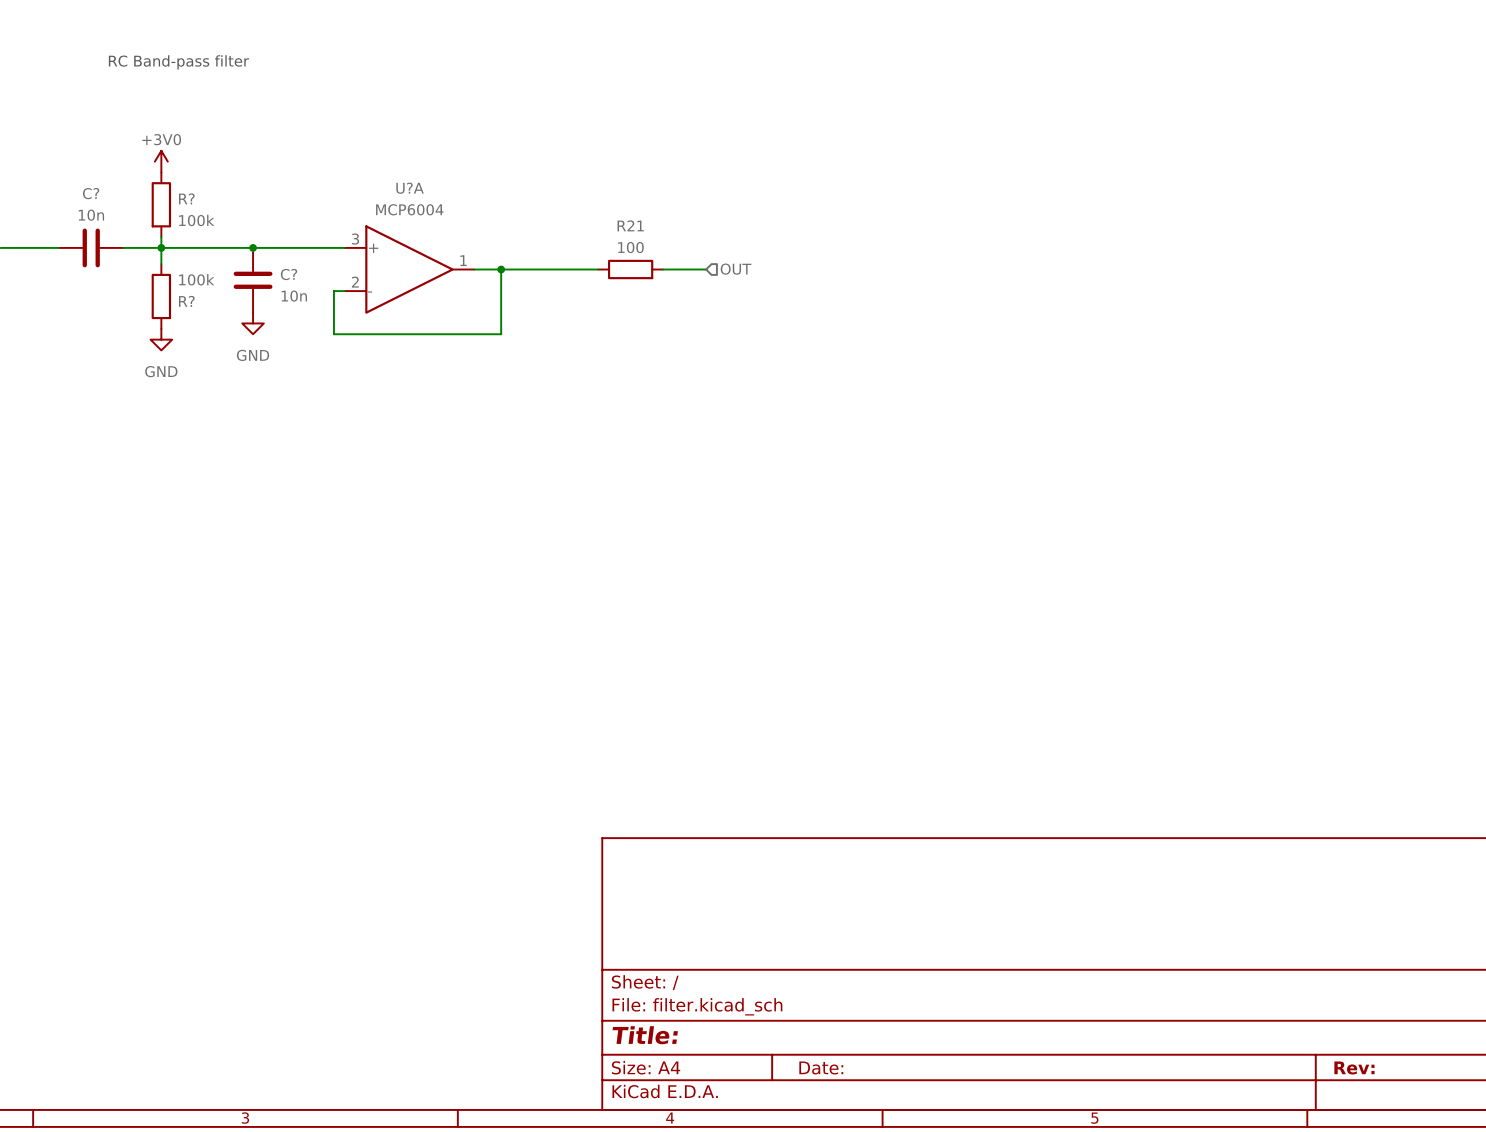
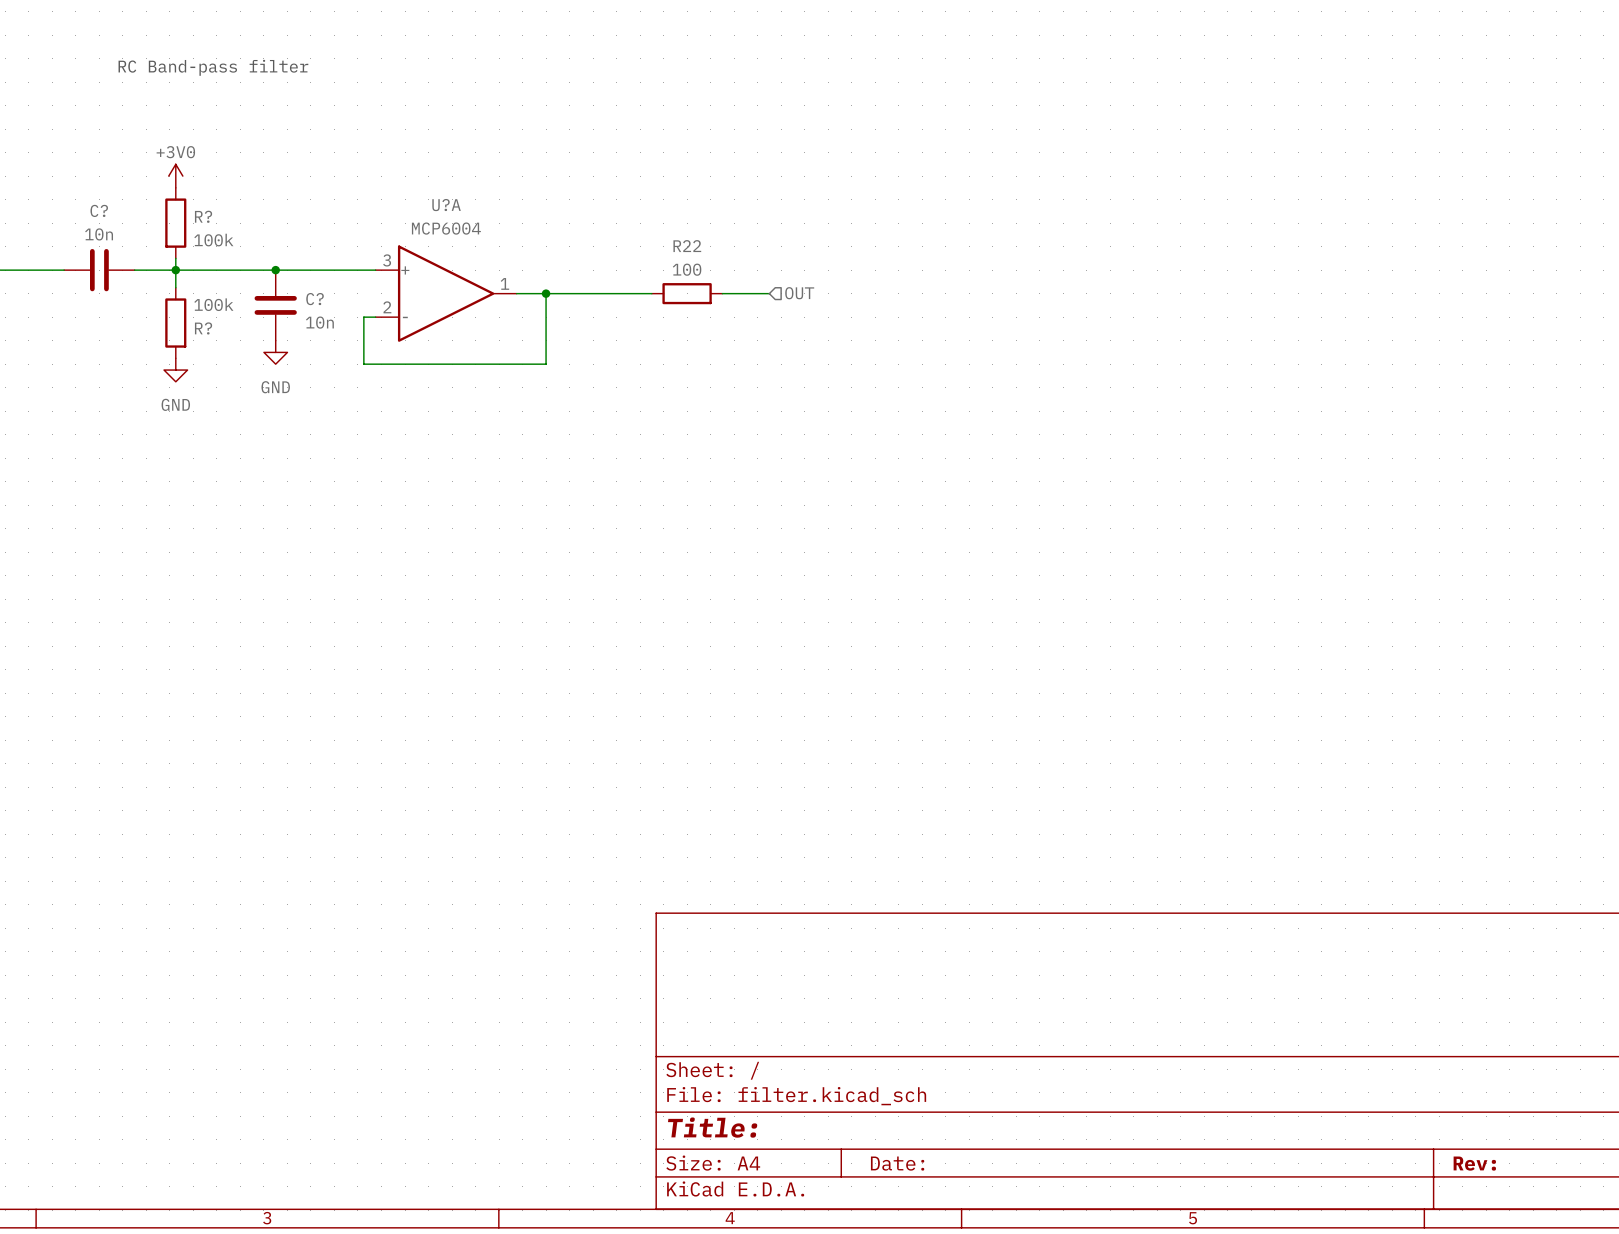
R21 name: R21 (630, 225) -> R22 (687, 246)

